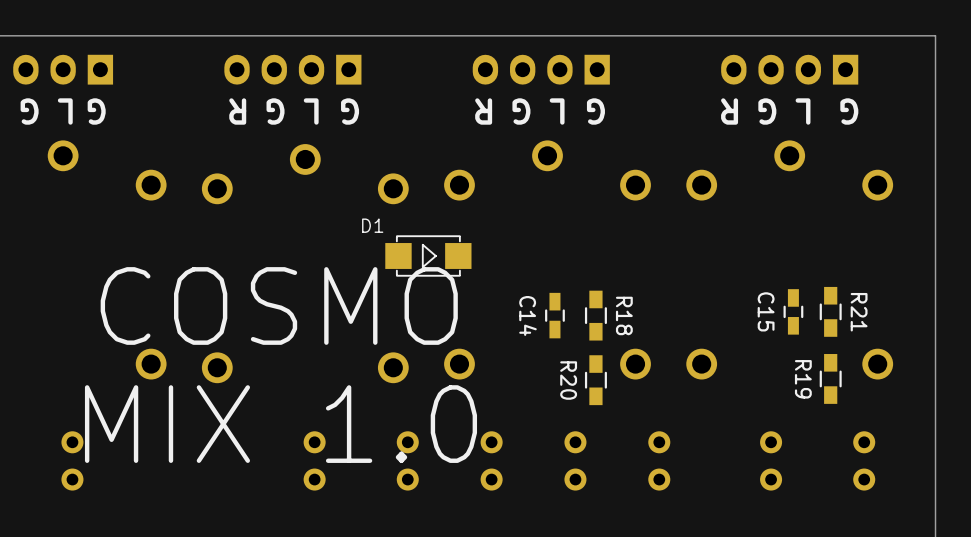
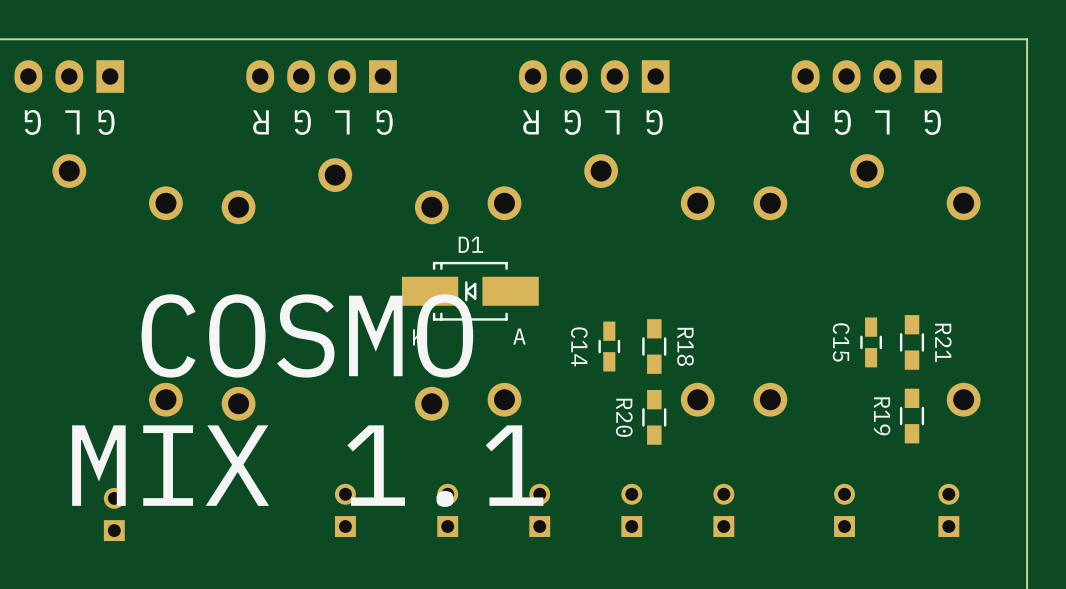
D1 name position: D1 (372, 225) -> D1 (470, 244)
D1 footprint: [385, 235, 472, 277] -> [401, 261, 539, 321]
text: MIX 1.0 (280, 424) -> MIX 1.1 (307, 466)
part footprint: [303, 431, 326, 491] -> [334, 483, 356, 537]
part footprint: [396, 431, 419, 491] -> [437, 483, 459, 537]
part footprint: [480, 431, 503, 491] -> [529, 483, 551, 537]
part footprint: [564, 431, 587, 491] -> [621, 483, 643, 537]
part footprint: [648, 431, 671, 491] -> [713, 483, 735, 537]
part footprint: [760, 431, 783, 491] -> [834, 483, 855, 537]
part footprint: [853, 431, 876, 491] -> [938, 483, 960, 537]
part: (72, 460) -> none
part: none -> (114, 514)

